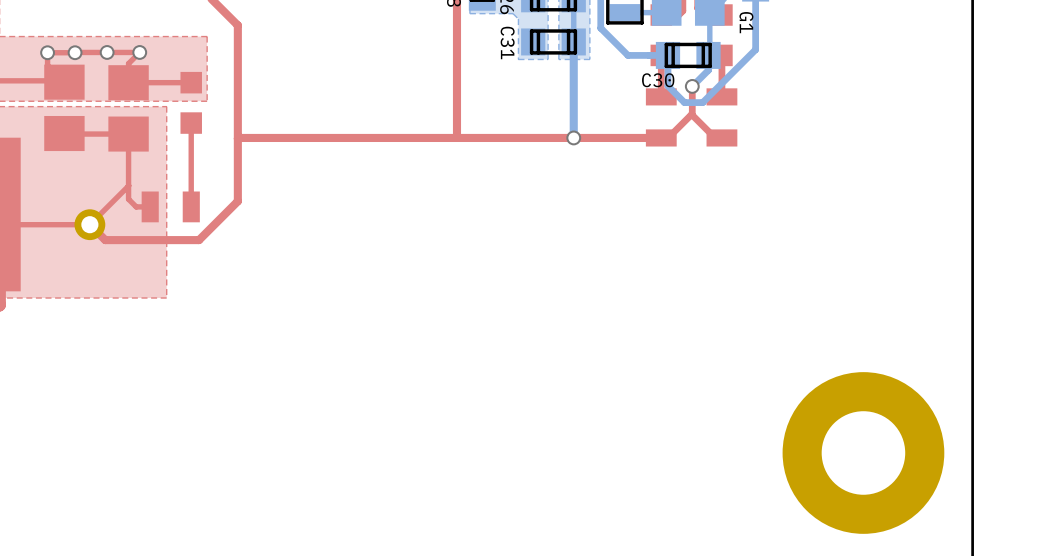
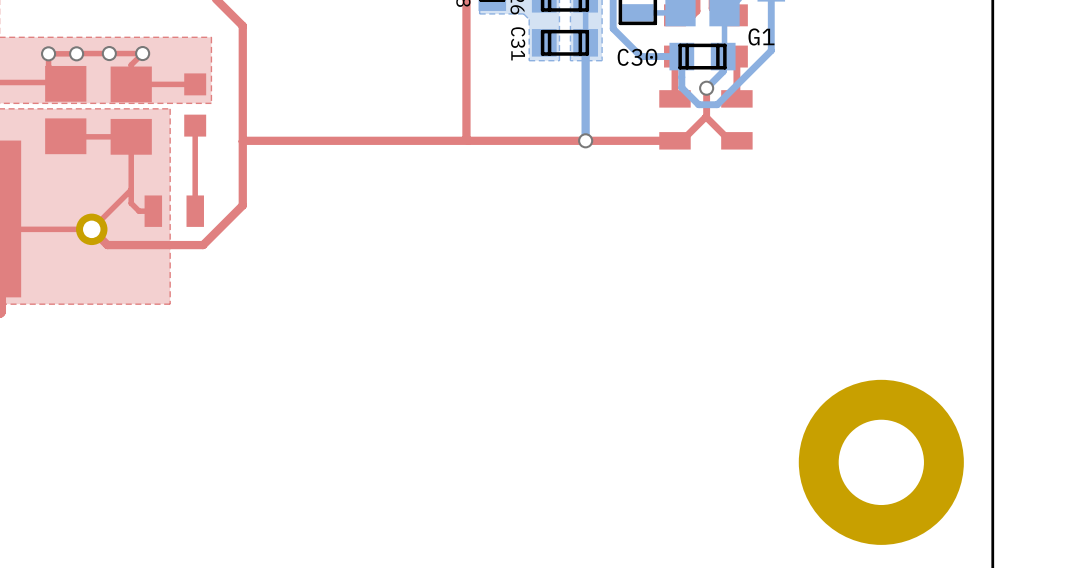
G1 name rotation: 0° (746, 22) -> 90° counterclockwise (761, 36)
C30 name position: C30 (658, 80) -> C30 (637, 57)

